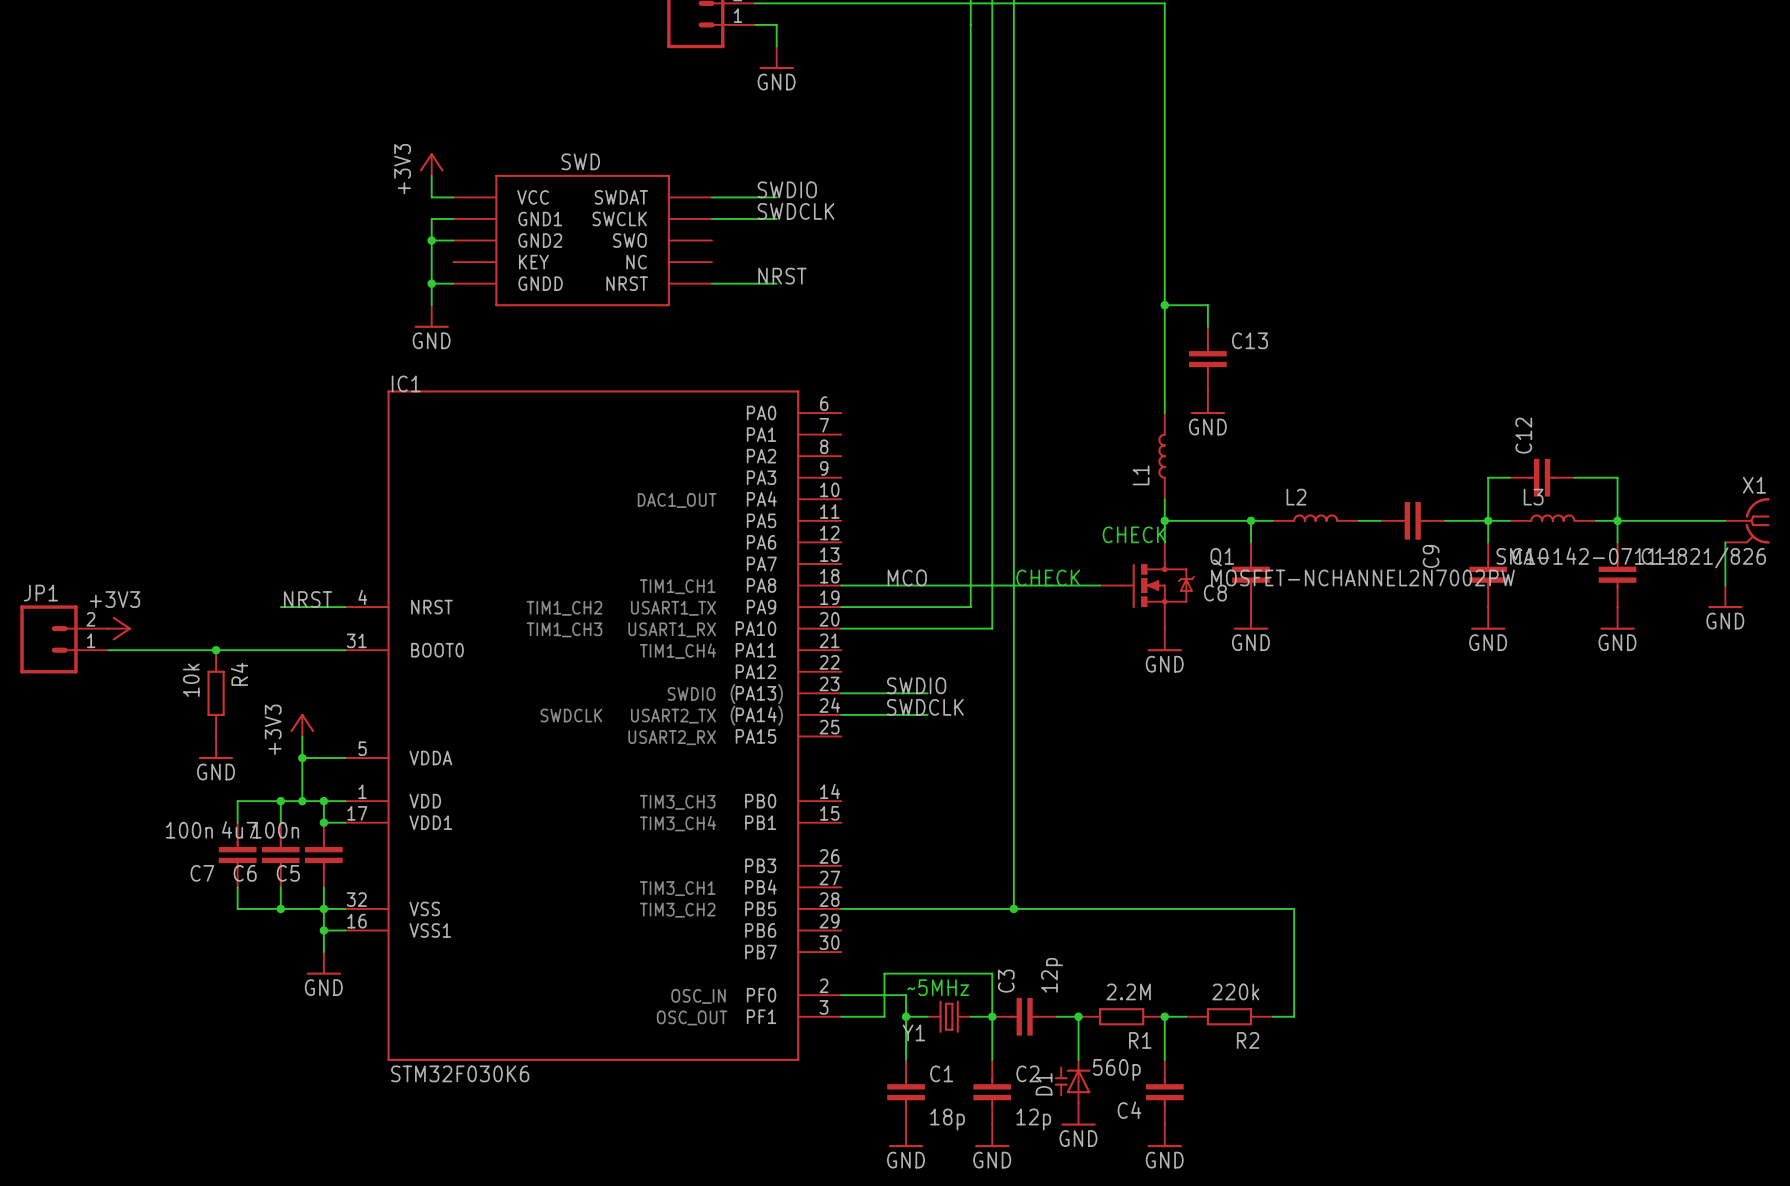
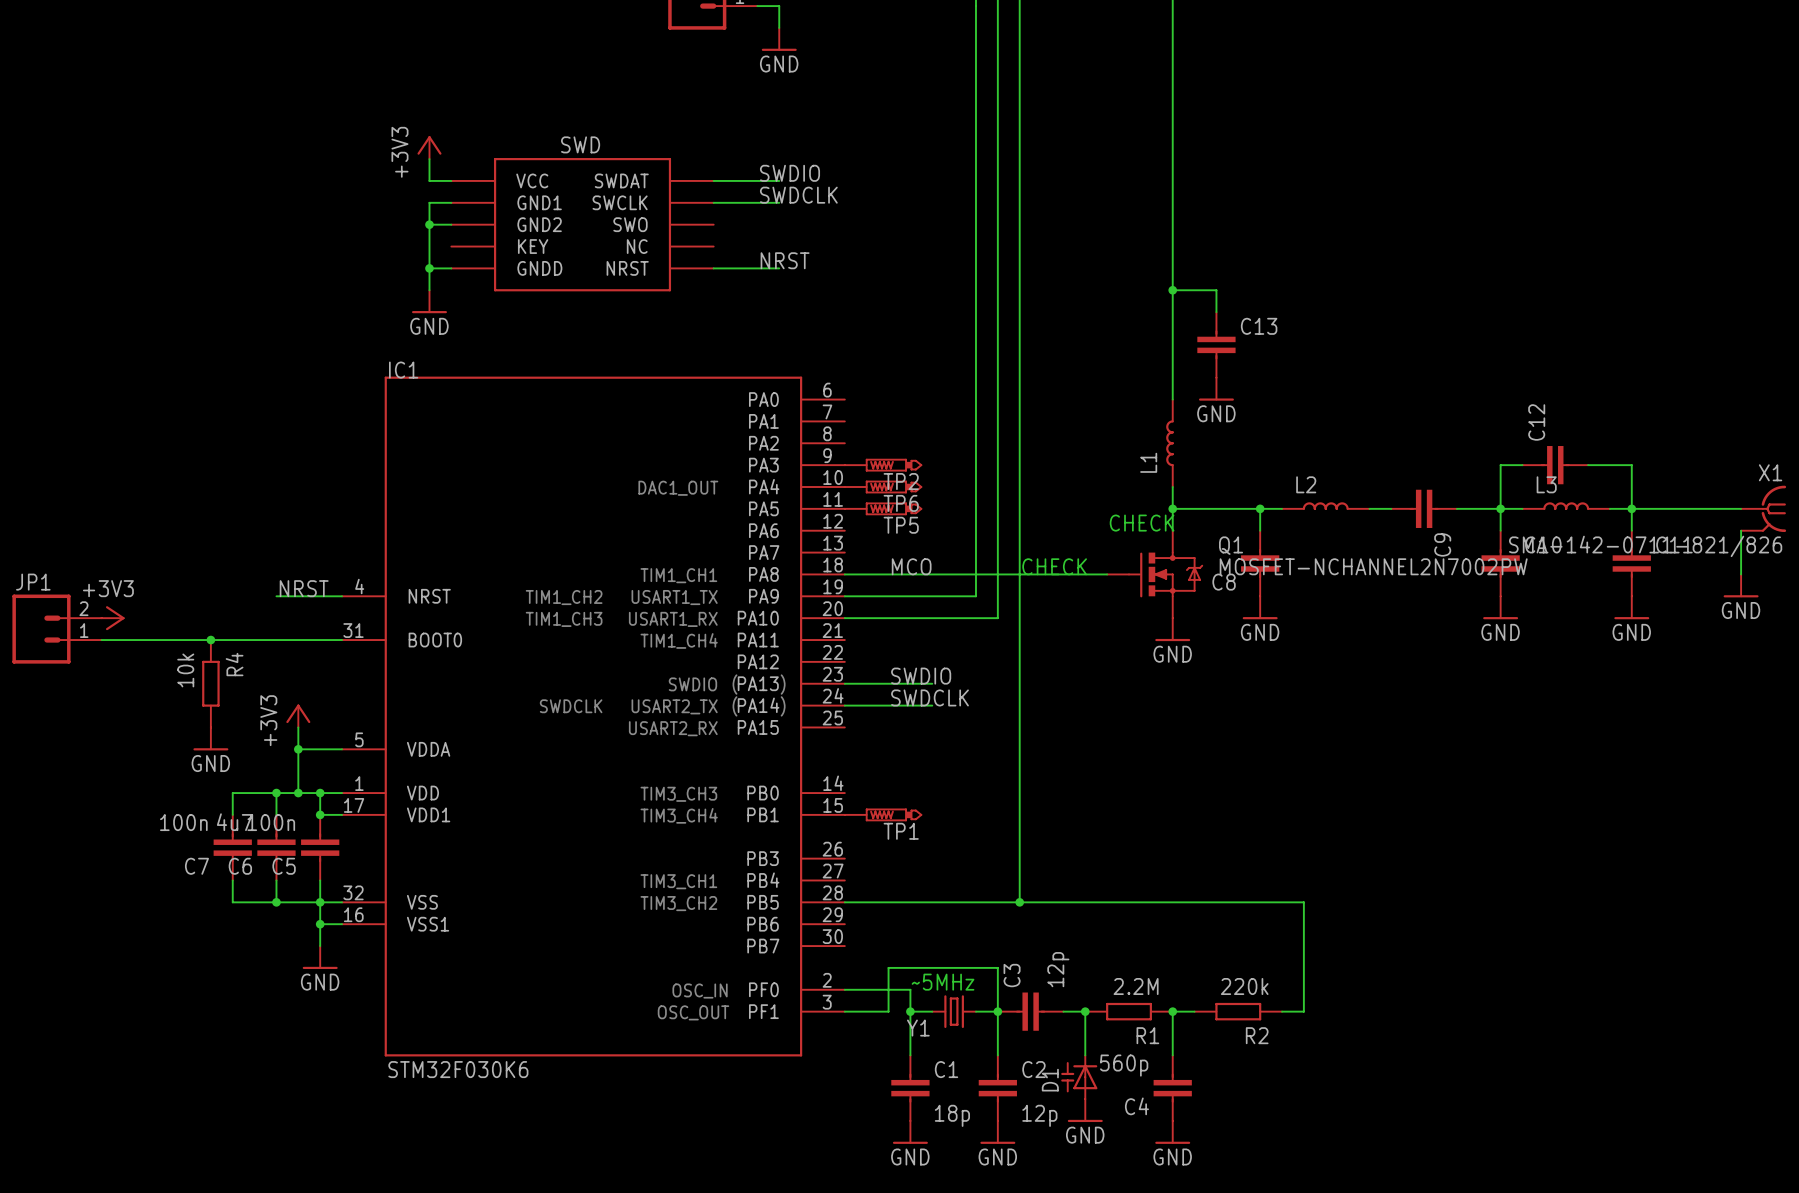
TP2: none -> (883, 465)
TP6: none -> (883, 487)
TP5: none -> (883, 508)
TP1: none -> (883, 814)

